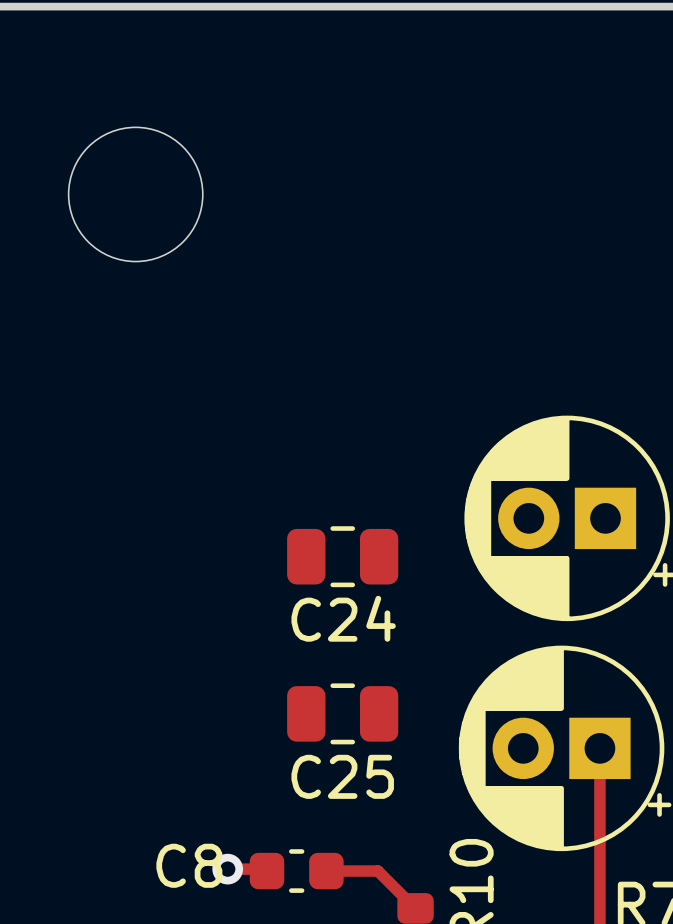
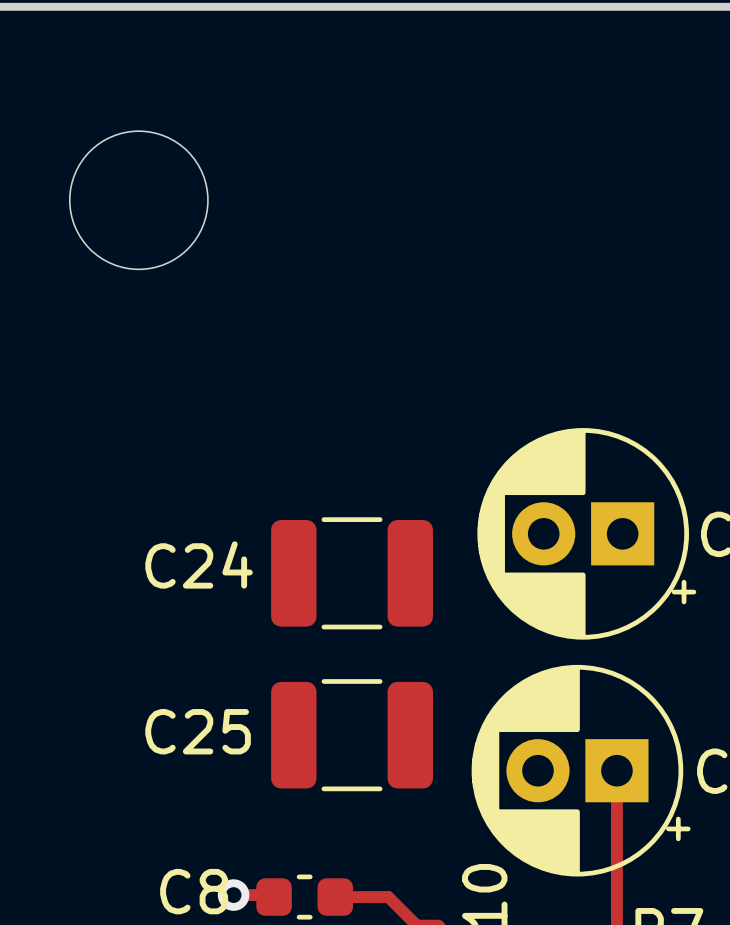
C24 footprint: [287, 526, 399, 588] -> [271, 517, 433, 630]
C24 name position: C24 (343, 618) -> C24 (199, 564)
C25 footprint: [287, 683, 399, 745] -> [271, 679, 433, 792]
C25 name position: C25 (342, 776) -> C25 (198, 731)

